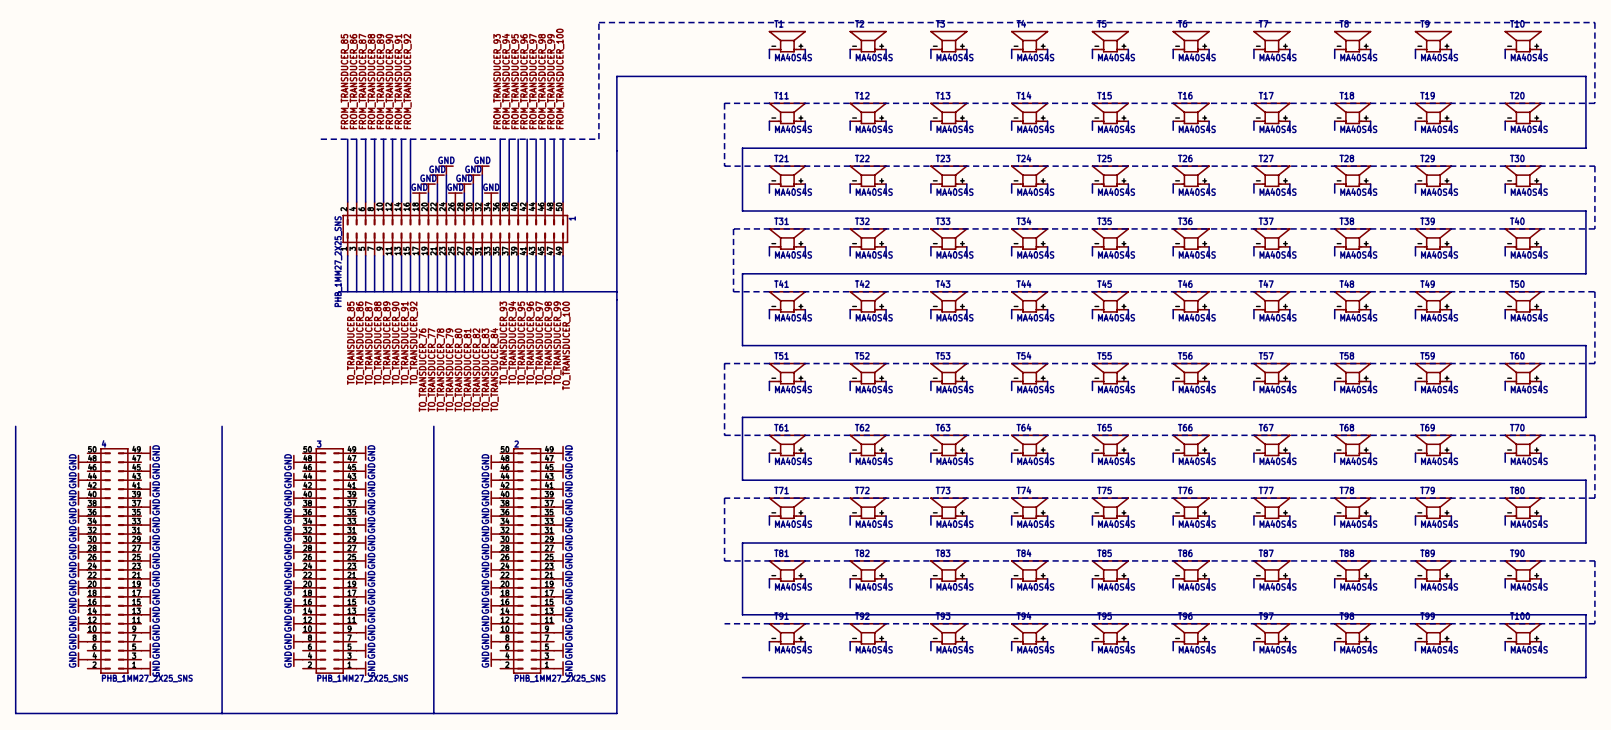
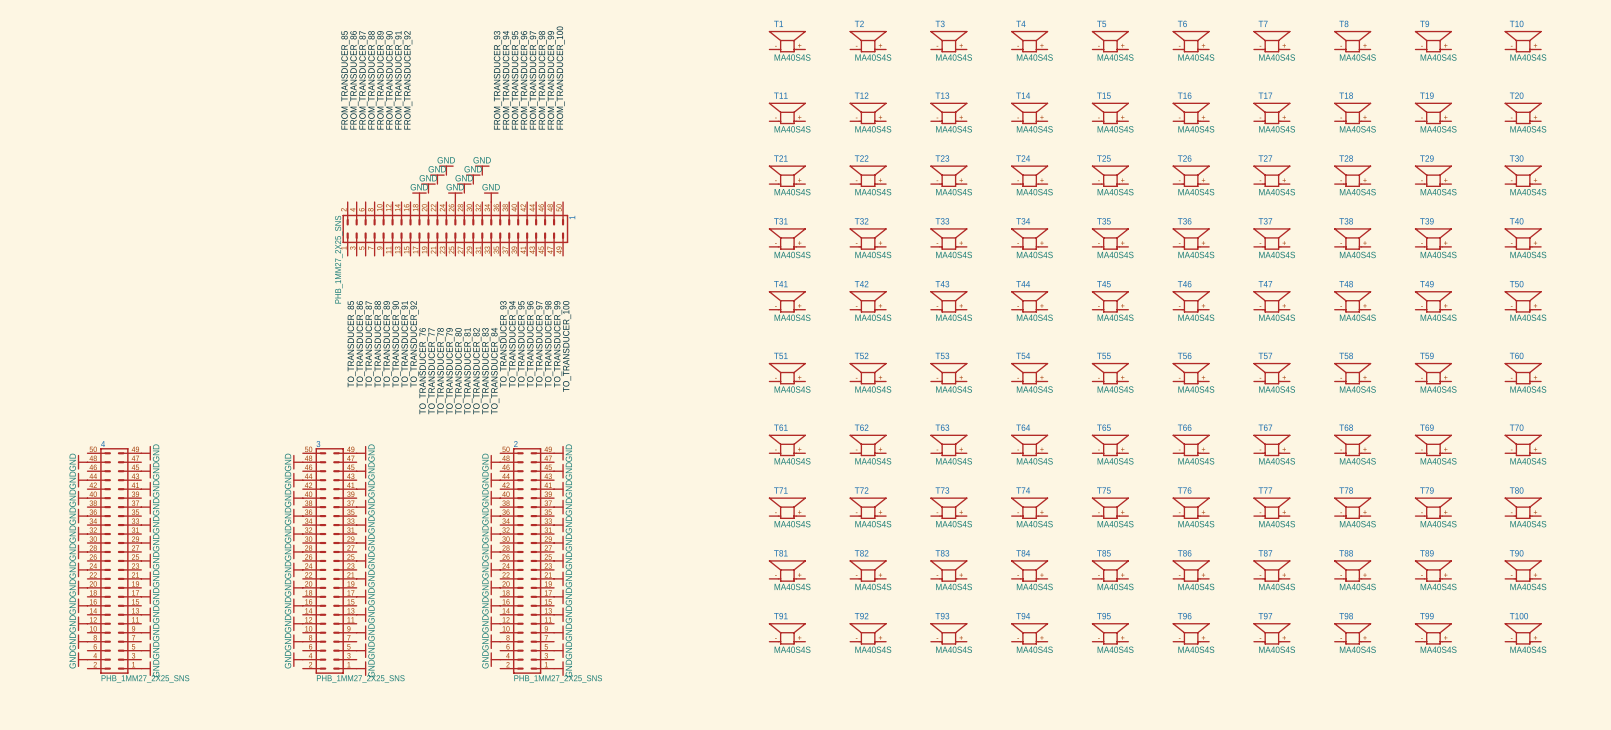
wire: (769, 49) (769, 58) -> none
wire: (805, 49) (805, 58) -> none
wire: (850, 49) (850, 58) -> none
wire: (886, 49) (886, 58) -> none
wire: (930, 49) (930, 58) -> none
wire: (966, 49) (966, 58) -> none
wire: (1011, 49) (1011, 58) -> none
wire: (1047, 49) (1047, 58) -> none
wire: (1092, 49) (1092, 58) -> none
wire: (1128, 49) (1128, 58) -> none
wire: (1173, 49) (1173, 58) -> none
wire: (1209, 49) (1209, 58) -> none
wire: (1253, 49) (1253, 58) -> none
wire: (1289, 49) (1289, 58) -> none
wire: (1334, 49) (1334, 58) -> none
wire: (1370, 49) (1370, 58) -> none
wire: (1415, 49) (1415, 58) -> none
wire: (1451, 49) (1451, 58) -> none
wire: (1505, 49) (1505, 58) -> none
wire: (1541, 49) (1541, 58) -> none
wire: (769, 121) (769, 130) -> none
wire: (805, 121) (805, 130) -> none
wire: (850, 121) (850, 130) -> none
wire: (886, 121) (886, 130) -> none
wire: (930, 121) (930, 130) -> none
wire: (966, 121) (966, 130) -> none
wire: (1011, 121) (1011, 130) -> none
wire: (1047, 121) (1047, 130) -> none
wire: (1092, 121) (1092, 130) -> none
wire: (1128, 121) (1128, 130) -> none
wire: (1173, 121) (1173, 130) -> none
wire: (1209, 121) (1209, 130) -> none
wire: (1253, 121) (1253, 130) -> none
wire: (1289, 121) (1289, 130) -> none
wire: (1334, 121) (1334, 130) -> none
wire: (1370, 121) (1370, 130) -> none
wire: (1415, 121) (1415, 130) -> none
wire: (1451, 121) (1451, 130) -> none
wire: (1505, 121) (1505, 130) -> none
wire: (1541, 121) (1541, 130) -> none
bus: (320, 139) (598, 139) (598, 22) (1594, 22) (1594, 103) (724, 103) (724, 166) (1594, 166) (1594, 228) (733, 228) (733, 291) (1594, 291) (1594, 363) (724, 363) (724, 435) (1594, 435) (1594, 498) (724, 498) (724, 560) (1594, 560) (1594, 623) (724, 623) -> none
wire: (347, 139) (347, 202) -> none
wire: (356, 139) (356, 202) -> none
wire: (365, 139) (365, 202) -> none
wire: (374, 139) (374, 202) -> none
wire: (383, 139) (383, 202) -> none
wire: (392, 139) (392, 202) -> none
wire: (401, 139) (401, 202) -> none
wire: (410, 139) (410, 202) -> none
wire: (500, 139) (500, 202) -> none
wire: (509, 139) (509, 202) -> none
wire: (518, 139) (518, 202) -> none
wire: (527, 139) (527, 202) -> none
wire: (536, 139) (536, 202) -> none
wire: (545, 139) (545, 202) -> none
wire: (554, 139) (554, 202) -> none
wire: (563, 139) (563, 202) -> none
wire: (446, 175) (446, 202) -> none
wire: (482, 175) (482, 202) -> none
wire: (437, 184) (437, 202) -> none
wire: (473, 184) (473, 202) -> none
wire: (769, 184) (769, 193) -> none
wire: (805, 184) (805, 193) -> none
wire: (850, 184) (850, 193) -> none
wire: (886, 184) (886, 193) -> none
wire: (930, 184) (930, 193) -> none
wire: (966, 184) (966, 193) -> none
wire: (1011, 184) (1011, 193) -> none
wire: (1047, 184) (1047, 193) -> none
wire: (1092, 184) (1092, 193) -> none
wire: (1128, 184) (1128, 193) -> none
wire: (1173, 184) (1173, 193) -> none
wire: (1209, 184) (1209, 193) -> none
wire: (1253, 184) (1253, 193) -> none
wire: (1289, 184) (1289, 193) -> none
wire: (1334, 184) (1334, 193) -> none
wire: (1370, 184) (1370, 193) -> none
wire: (1415, 184) (1415, 193) -> none
wire: (1451, 184) (1451, 193) -> none
wire: (1505, 184) (1505, 193) -> none
wire: (1541, 184) (1541, 193) -> none
wire: (428, 193) (428, 202) -> none
wire: (464, 193) (464, 202) -> none
wire: (769, 246) (769, 255) -> none
wire: (805, 246) (805, 255) -> none
wire: (850, 246) (850, 255) -> none
wire: (886, 246) (886, 255) -> none
wire: (930, 246) (930, 255) -> none
wire: (966, 246) (966, 255) -> none
wire: (1011, 246) (1011, 255) -> none
wire: (1047, 246) (1047, 255) -> none
wire: (1092, 246) (1092, 255) -> none
wire: (1128, 246) (1128, 255) -> none
wire: (1173, 246) (1173, 255) -> none
wire: (1209, 246) (1209, 255) -> none
wire: (1253, 246) (1253, 255) -> none
wire: (1289, 246) (1289, 255) -> none
wire: (1334, 246) (1334, 255) -> none
wire: (1370, 246) (1370, 255) -> none
wire: (1415, 246) (1415, 255) -> none
wire: (1451, 246) (1451, 255) -> none
wire: (1505, 246) (1505, 255) -> none
wire: (1541, 246) (1541, 255) -> none
wire: (347, 255) (347, 291) -> none
wire: (356, 255) (356, 291) -> none
wire: (365, 255) (365, 291) -> none
wire: (374, 255) (374, 291) -> none
wire: (383, 255) (383, 291) -> none
wire: (392, 255) (392, 291) -> none
wire: (401, 255) (401, 291) -> none
wire: (410, 255) (410, 291) -> none
wire: (419, 255) (419, 291) -> none
wire: (428, 255) (428, 291) -> none
wire: (437, 255) (437, 291) -> none
wire: (446, 255) (446, 291) -> none
wire: (455, 255) (455, 291) -> none
wire: (464, 255) (464, 291) -> none
wire: (473, 255) (473, 291) -> none
wire: (482, 255) (482, 291) -> none
wire: (491, 255) (491, 291) -> none
wire: (500, 255) (500, 291) -> none
wire: (509, 255) (509, 291) -> none
wire: (518, 255) (518, 291) -> none
wire: (527, 255) (527, 291) -> none
wire: (536, 255) (536, 291) -> none
wire: (545, 255) (545, 291) -> none
wire: (554, 255) (554, 291) -> none
wire: (563, 255) (563, 291) -> none
bus: (338, 291) (616, 291) -> none
wire: (769, 309) (769, 318) -> none
wire: (805, 309) (805, 318) -> none
wire: (850, 309) (850, 318) -> none
wire: (886, 309) (886, 318) -> none
wire: (930, 309) (930, 318) -> none
wire: (966, 309) (966, 318) -> none
wire: (1011, 309) (1011, 318) -> none
wire: (1047, 309) (1047, 318) -> none
wire: (1092, 309) (1092, 318) -> none
wire: (1128, 309) (1128, 318) -> none
wire: (1173, 309) (1173, 318) -> none
wire: (1209, 309) (1209, 318) -> none
wire: (1253, 309) (1253, 318) -> none
wire: (1289, 309) (1289, 318) -> none
wire: (1334, 309) (1334, 318) -> none
wire: (1370, 309) (1370, 318) -> none
wire: (1415, 309) (1415, 318) -> none
wire: (1451, 309) (1451, 318) -> none
wire: (1505, 309) (1505, 318) -> none
wire: (1541, 309) (1541, 318) -> none
wire: (769, 381) (769, 390) -> none
wire: (805, 381) (805, 390) -> none
wire: (850, 381) (850, 390) -> none
wire: (886, 381) (886, 390) -> none
wire: (930, 381) (930, 390) -> none
wire: (966, 381) (966, 390) -> none
wire: (1011, 381) (1011, 390) -> none
wire: (1047, 381) (1047, 390) -> none
wire: (1092, 381) (1092, 390) -> none
wire: (1128, 381) (1128, 390) -> none
wire: (1173, 381) (1173, 390) -> none
wire: (1209, 381) (1209, 390) -> none
wire: (1253, 381) (1253, 390) -> none
wire: (1289, 381) (1289, 390) -> none
wire: (1334, 381) (1334, 390) -> none
wire: (1370, 381) (1370, 390) -> none
wire: (1415, 381) (1415, 390) -> none
wire: (1451, 381) (1451, 390) -> none
wire: (1505, 381) (1505, 390) -> none
wire: (1541, 381) (1541, 390) -> none
bus: (15, 426) (15, 713) (616, 713) (616, 76) (1585, 76) (1585, 148) (742, 148) (742, 211) (1585, 211) (1585, 273) (742, 273) (742, 345) (1585, 345) (1585, 417) (742, 417) (742, 480) (1585, 480) (1585, 543) (742, 543) (742, 614) (1585, 614) (1585, 677) (742, 677) -> none
bus: (222, 426) (222, 713) -> none
bus: (433, 426) (433, 713) -> none
wire: (769, 453) (769, 462) -> none
wire: (805, 453) (805, 462) -> none
wire: (850, 453) (850, 462) -> none
wire: (886, 453) (886, 462) -> none
wire: (930, 453) (930, 462) -> none
wire: (966, 453) (966, 462) -> none
wire: (1011, 453) (1011, 462) -> none
wire: (1047, 453) (1047, 462) -> none
wire: (1092, 453) (1092, 462) -> none
wire: (1128, 453) (1128, 462) -> none
wire: (1173, 453) (1173, 462) -> none
wire: (1209, 453) (1209, 462) -> none
wire: (1253, 453) (1253, 462) -> none
wire: (1289, 453) (1289, 462) -> none
wire: (1334, 453) (1334, 462) -> none
wire: (1370, 453) (1370, 462) -> none
wire: (1415, 453) (1415, 462) -> none
wire: (1451, 453) (1451, 462) -> none
wire: (1505, 453) (1505, 462) -> none
wire: (1541, 453) (1541, 462) -> none
wire: (769, 516) (769, 525) -> none
wire: (805, 516) (805, 525) -> none
wire: (850, 516) (850, 525) -> none
wire: (886, 516) (886, 525) -> none
wire: (930, 516) (930, 525) -> none
wire: (966, 516) (966, 525) -> none
wire: (1011, 516) (1011, 525) -> none
wire: (1047, 516) (1047, 525) -> none
wire: (1092, 516) (1092, 525) -> none
wire: (1128, 516) (1128, 525) -> none
wire: (1173, 516) (1173, 525) -> none
wire: (1209, 516) (1209, 525) -> none
wire: (1253, 516) (1253, 525) -> none
wire: (1289, 516) (1289, 525) -> none
wire: (1334, 516) (1334, 525) -> none
wire: (1370, 516) (1370, 525) -> none
wire: (1415, 516) (1415, 525) -> none
wire: (1451, 516) (1451, 525) -> none
wire: (1505, 516) (1505, 525) -> none
wire: (1541, 516) (1541, 525) -> none
wire: (769, 578) (769, 587) -> none
wire: (805, 578) (805, 587) -> none
wire: (850, 578) (850, 587) -> none
wire: (886, 578) (886, 587) -> none
wire: (930, 578) (930, 587) -> none
wire: (966, 578) (966, 587) -> none
wire: (1011, 578) (1011, 587) -> none
wire: (1047, 578) (1047, 587) -> none
wire: (1092, 578) (1092, 587) -> none
wire: (1128, 578) (1128, 587) -> none
wire: (1173, 578) (1173, 587) -> none
wire: (1209, 578) (1209, 587) -> none
wire: (1253, 578) (1253, 587) -> none
wire: (1289, 578) (1289, 587) -> none
wire: (1334, 578) (1334, 587) -> none
wire: (1370, 578) (1370, 587) -> none
wire: (1415, 578) (1415, 587) -> none
wire: (1451, 578) (1451, 587) -> none
wire: (1505, 578) (1505, 587) -> none
wire: (1541, 578) (1541, 587) -> none
wire: (769, 641) (769, 650) -> none
wire: (805, 641) (805, 650) -> none
wire: (850, 641) (850, 650) -> none
wire: (886, 641) (886, 650) -> none
wire: (930, 641) (930, 650) -> none
wire: (966, 641) (966, 650) -> none
wire: (1011, 641) (1011, 650) -> none
wire: (1047, 641) (1047, 650) -> none
wire: (1092, 641) (1092, 650) -> none
wire: (1128, 641) (1128, 650) -> none
wire: (1173, 641) (1173, 650) -> none
wire: (1209, 641) (1209, 650) -> none
wire: (1253, 641) (1253, 650) -> none
wire: (1289, 641) (1289, 650) -> none
wire: (1334, 641) (1334, 650) -> none
wire: (1370, 641) (1370, 650) -> none
wire: (1415, 641) (1415, 650) -> none
wire: (1451, 641) (1451, 650) -> none
wire: (1505, 641) (1505, 650) -> none
wire: (1541, 641) (1541, 650) -> none

